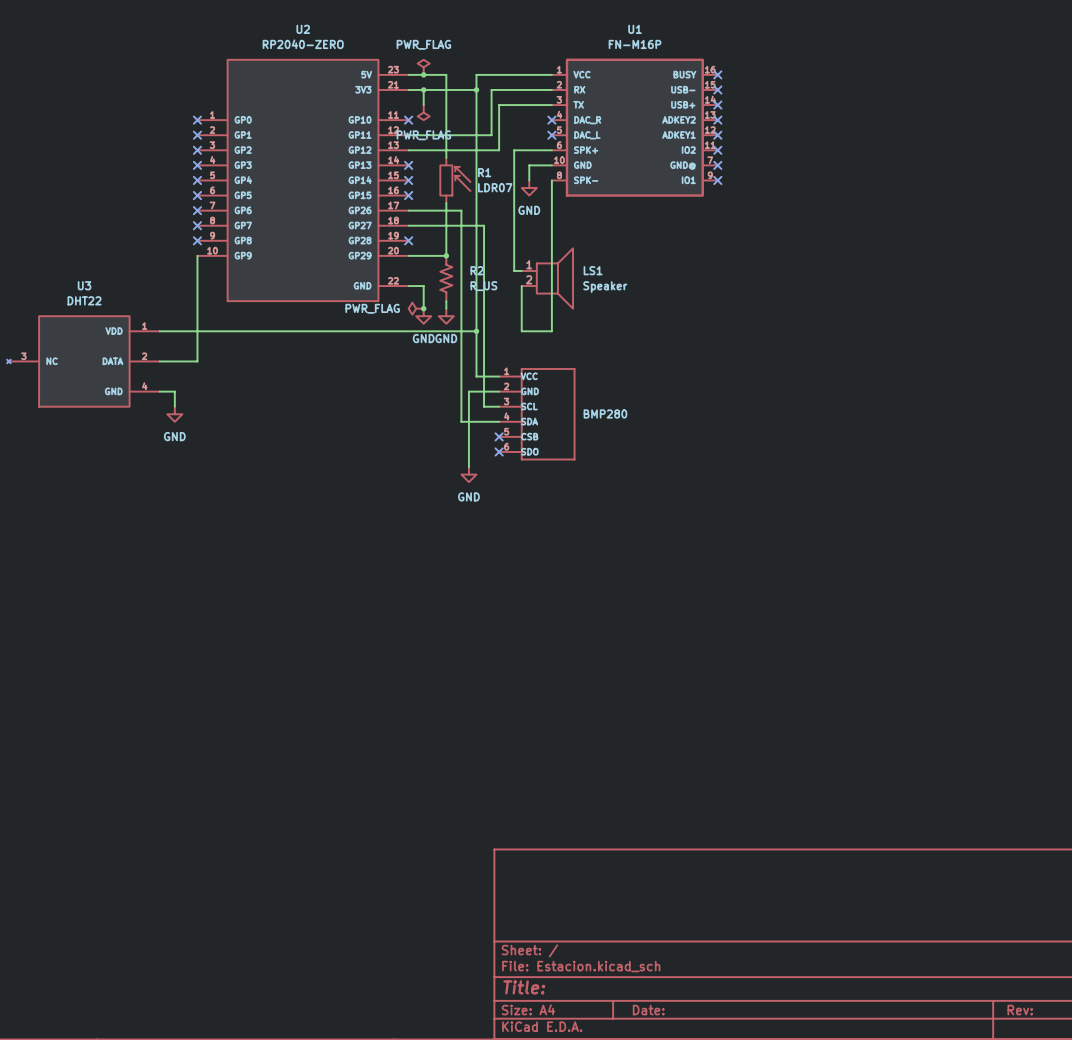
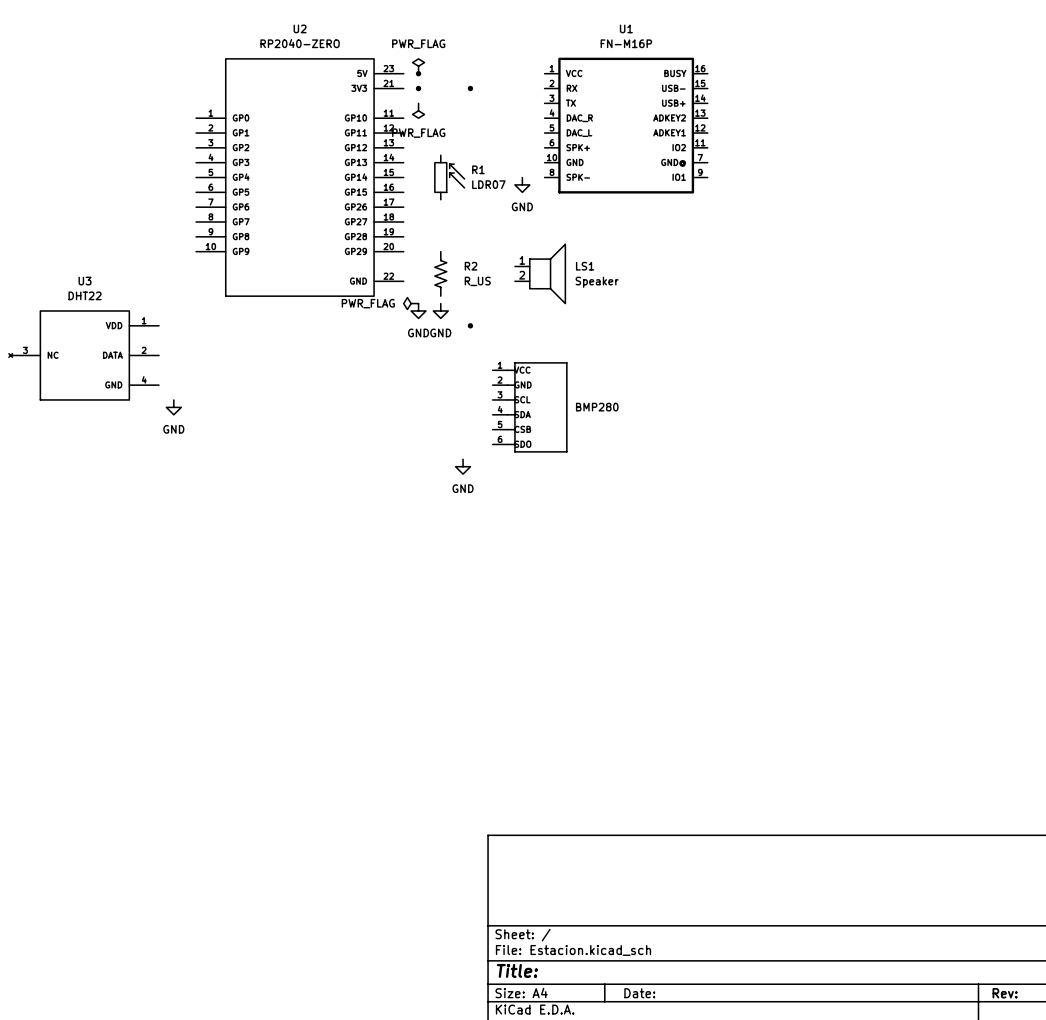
wire: (408, 74) (446, 74) (446, 157) -> none
wire: (551, 74) (476, 74) (476, 376) (499, 376) -> none
no-connect mark: (717, 74) -> none
wire: (408, 89) (476, 89) -> none
wire: (423, 89) (423, 105) -> none
wire: (551, 89) (491, 89) (491, 135) (408, 135) -> none
no-connect mark: (717, 89) -> none
wire: (551, 105) (499, 105) (499, 150) (408, 150) -> none
no-connect mark: (717, 105) -> none
no-connect mark: (197, 120) -> none
no-connect mark: (408, 120) -> none
no-connect mark: (551, 120) -> none
no-connect mark: (717, 120) -> none
no-connect mark: (197, 135) -> none
no-connect mark: (551, 135) -> none
no-connect mark: (717, 135) -> none
no-connect mark: (197, 150) -> none
wire: (551, 150) (514, 150) (514, 270) (521, 270) -> none
no-connect mark: (717, 150) -> none
no-connect mark: (197, 165) -> none
no-connect mark: (408, 165) -> none
wire: (551, 165) (529, 165) (529, 180) -> none
no-connect mark: (717, 165) -> none
no-connect mark: (197, 180) -> none
no-connect mark: (408, 180) -> none
wire: (551, 180) (551, 331) (521, 331) (521, 286) -> none
no-connect mark: (717, 180) -> none
no-connect mark: (197, 195) -> none
no-connect mark: (408, 195) -> none
wire: (446, 203) (446, 255) (408, 255) -> none
no-connect mark: (197, 210) -> none
wire: (408, 210) (461, 210) (461, 421) (499, 421) -> none
no-connect mark: (197, 225) -> none
wire: (408, 225) (484, 225) (484, 406) (499, 406) -> none
no-connect mark: (197, 240) -> none
no-connect mark: (408, 240) -> none
wire: (197, 255) (197, 361) (159, 361) -> none
junction: (446, 255) -> none
wire: (408, 286) (423, 286) (423, 308) -> none
wire: (446, 301) (446, 308) -> none
junction: (423, 308) -> none
wire: (159, 331) (476, 331) -> none
wire: (159, 391) (174, 391) (174, 406) -> none
wire: (499, 391) (468, 391) (468, 467) -> none
no-connect mark: (499, 436) -> none
no-connect mark: (499, 451) -> none

